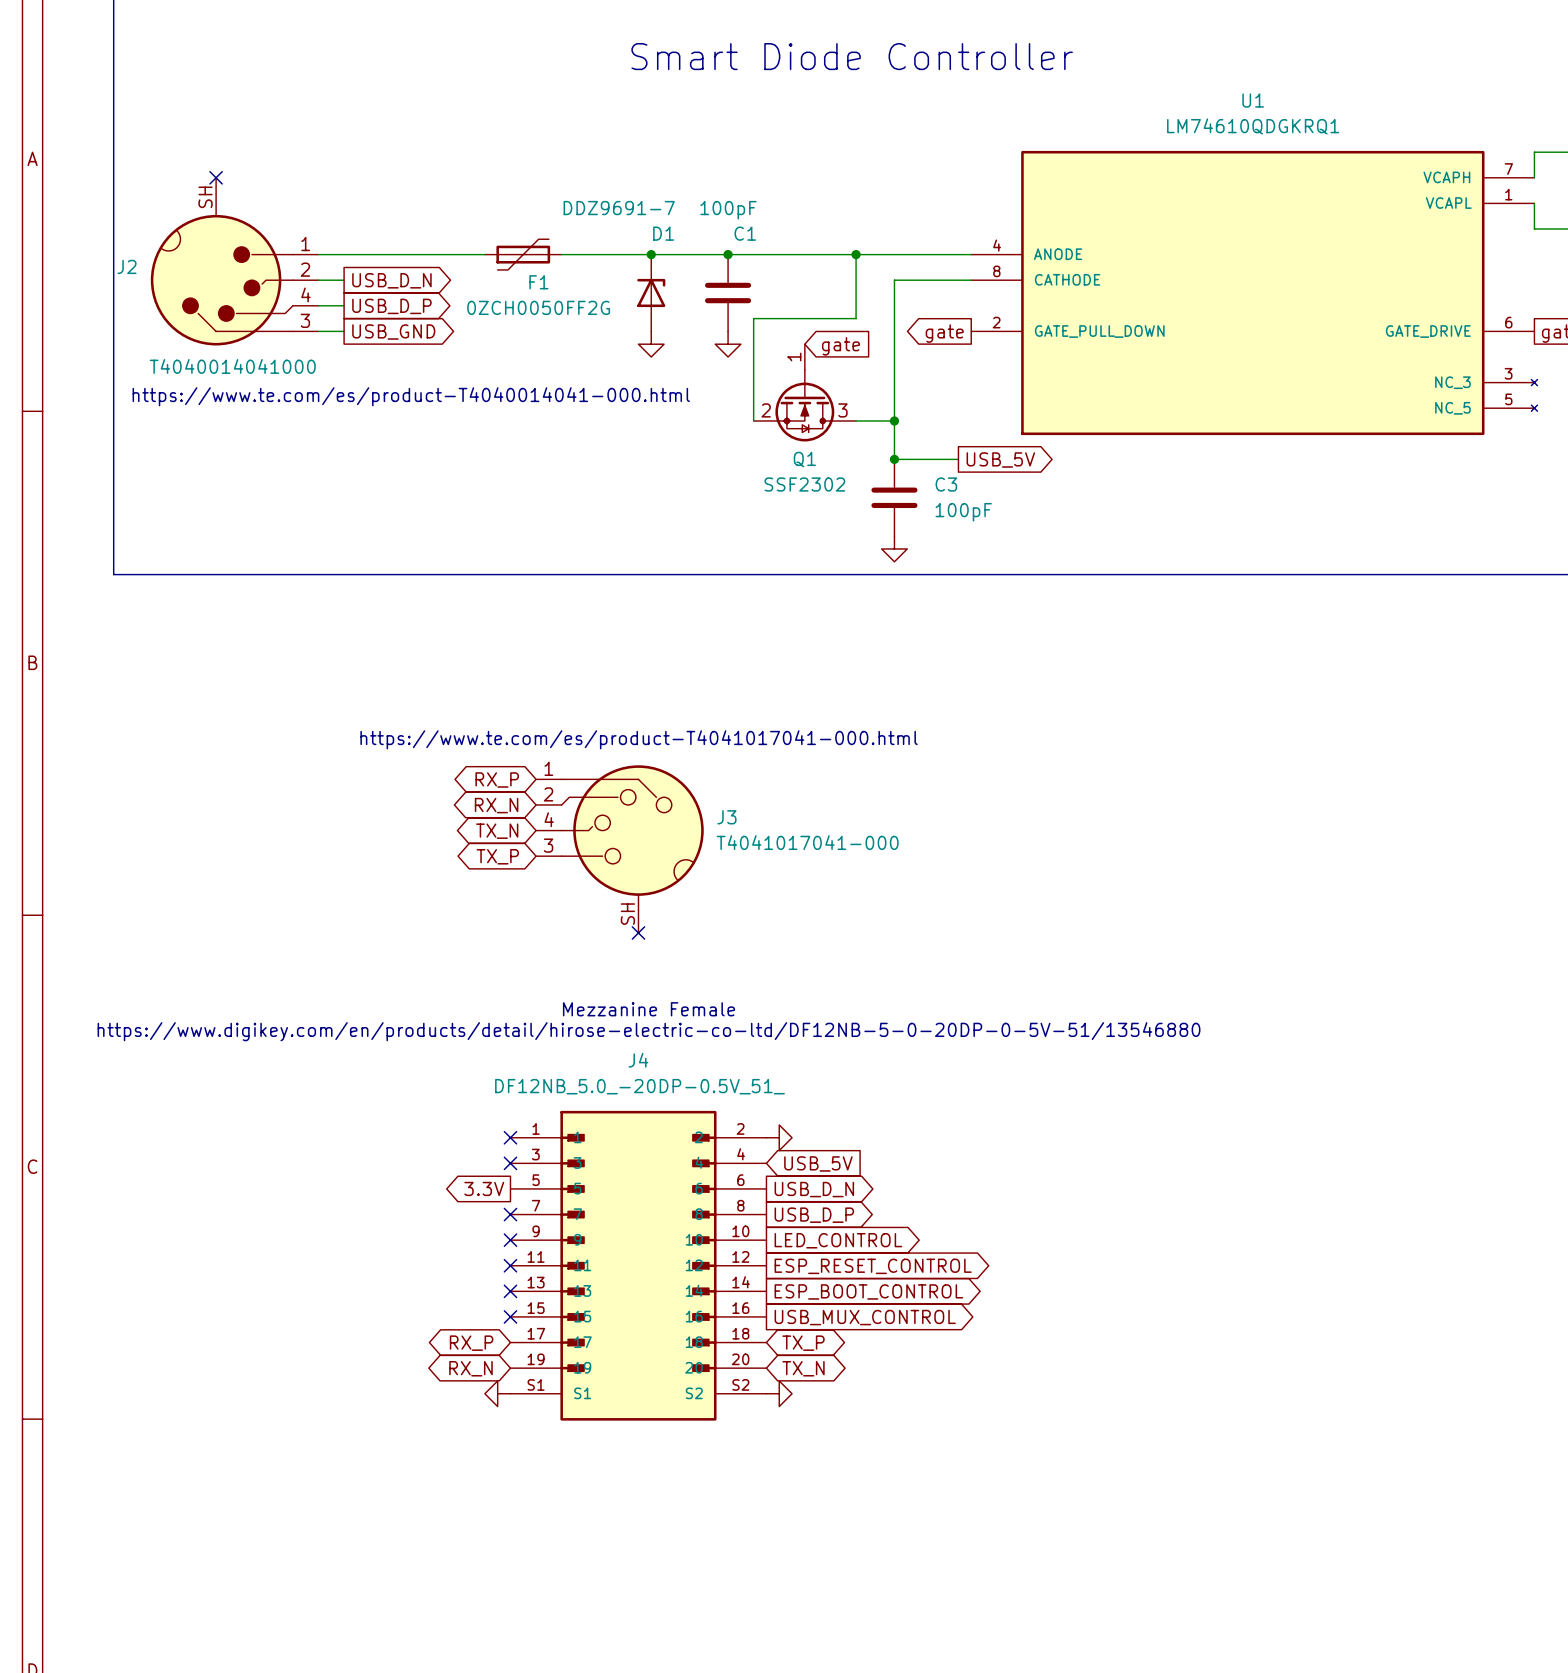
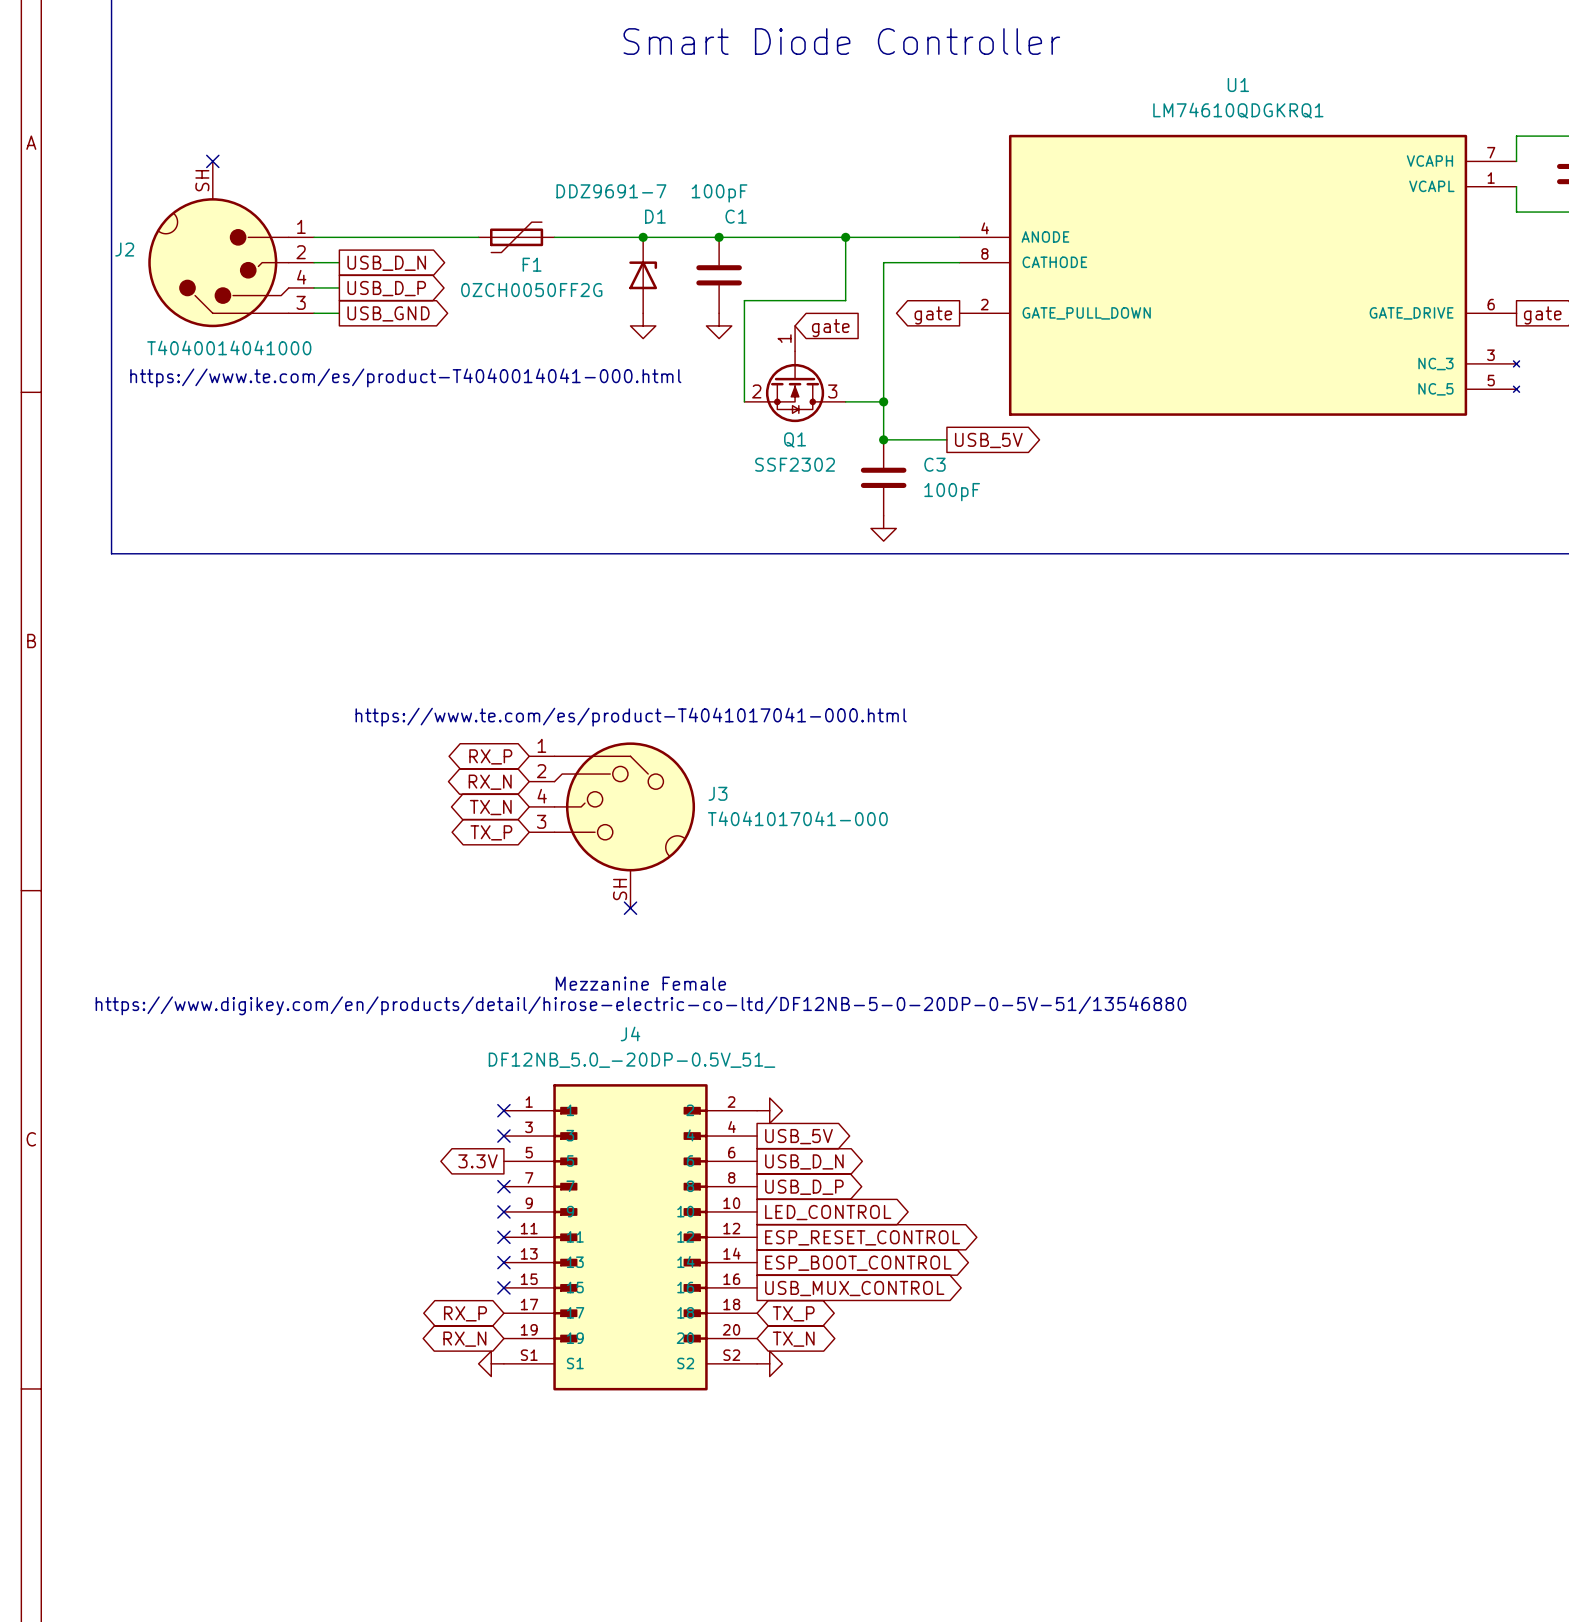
global label shape: input (818, 1163) -> output (798, 1136)

